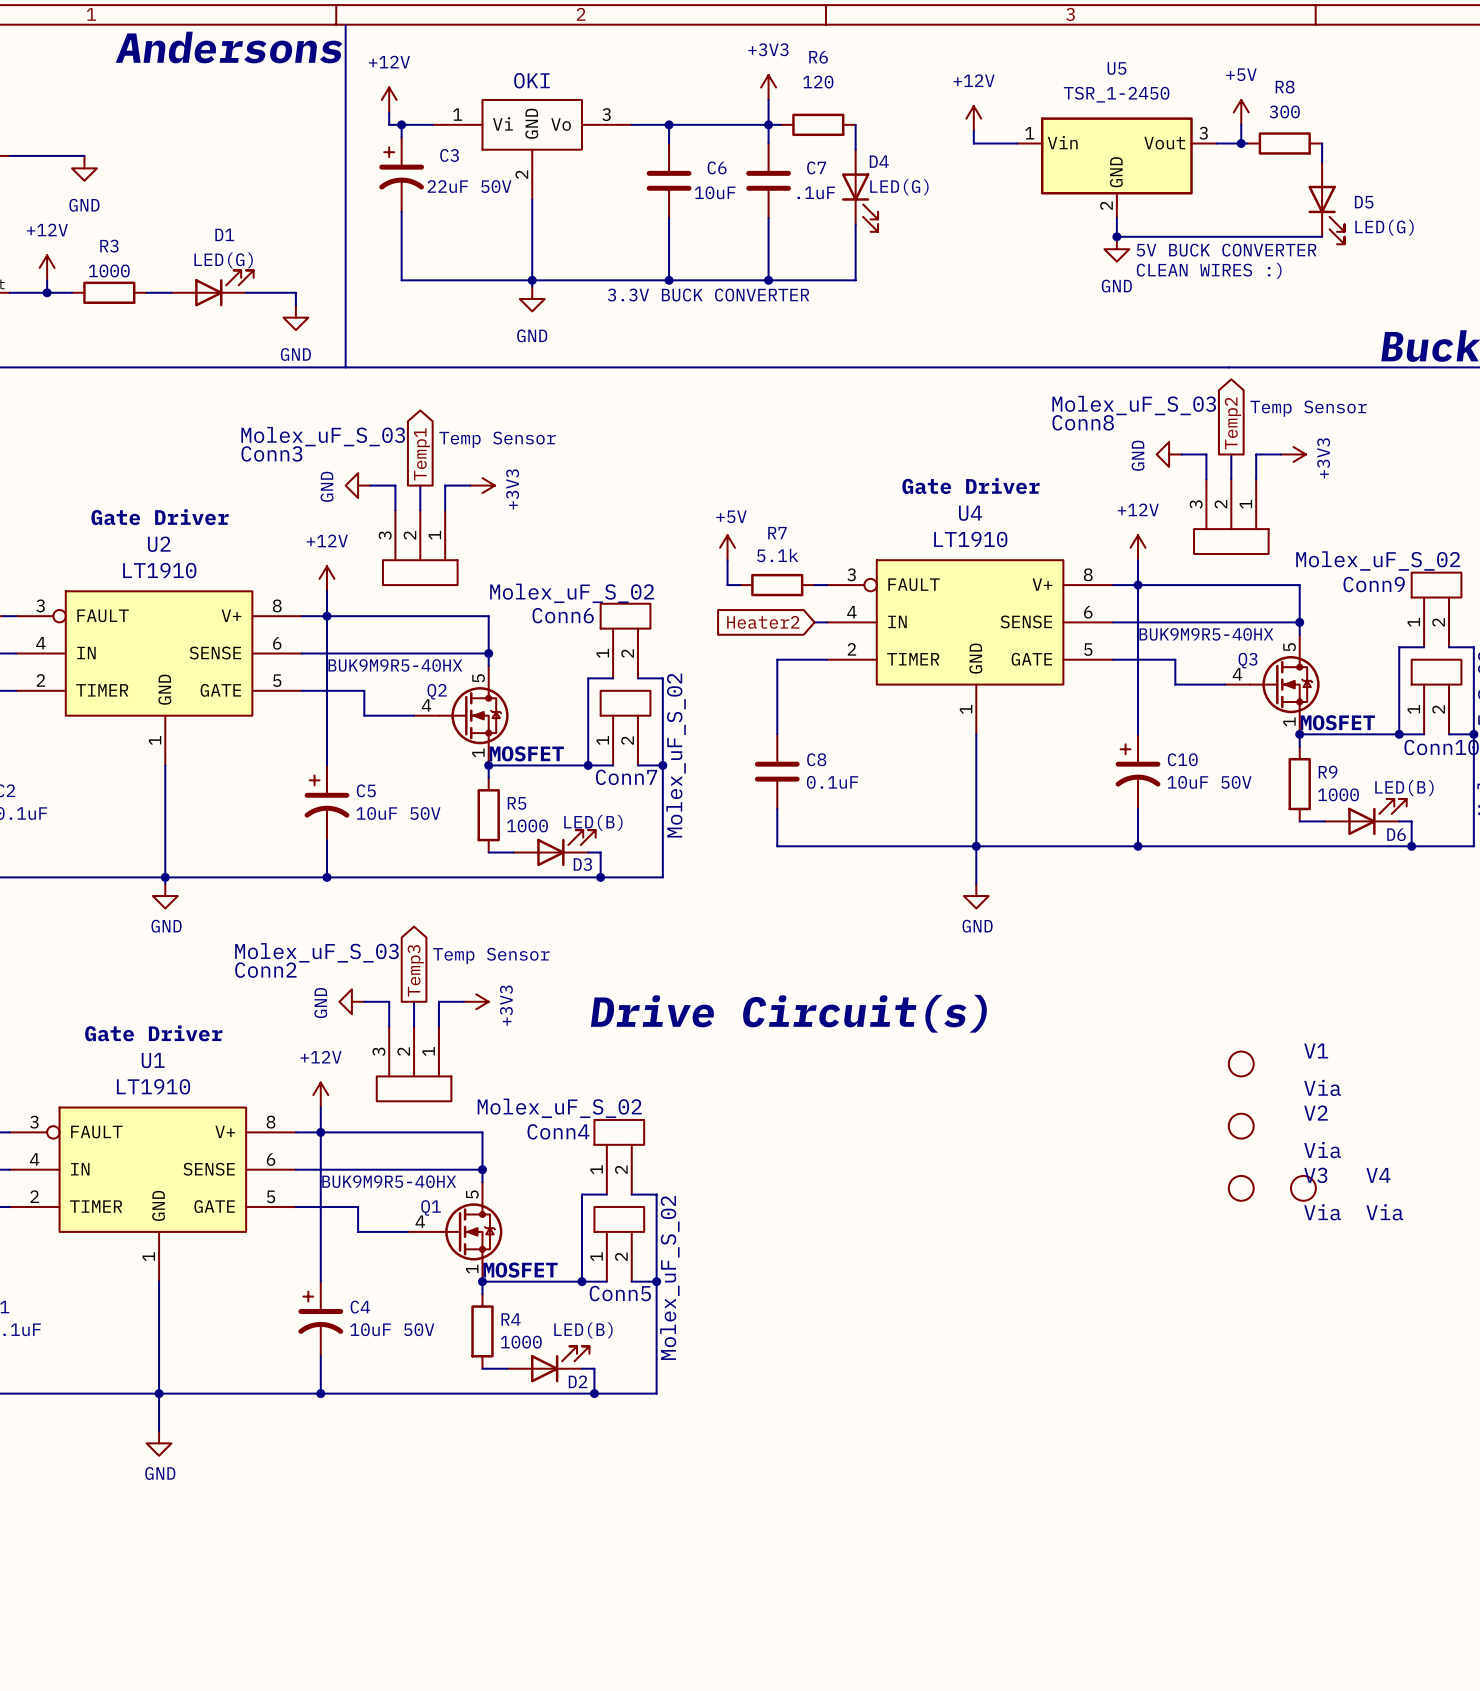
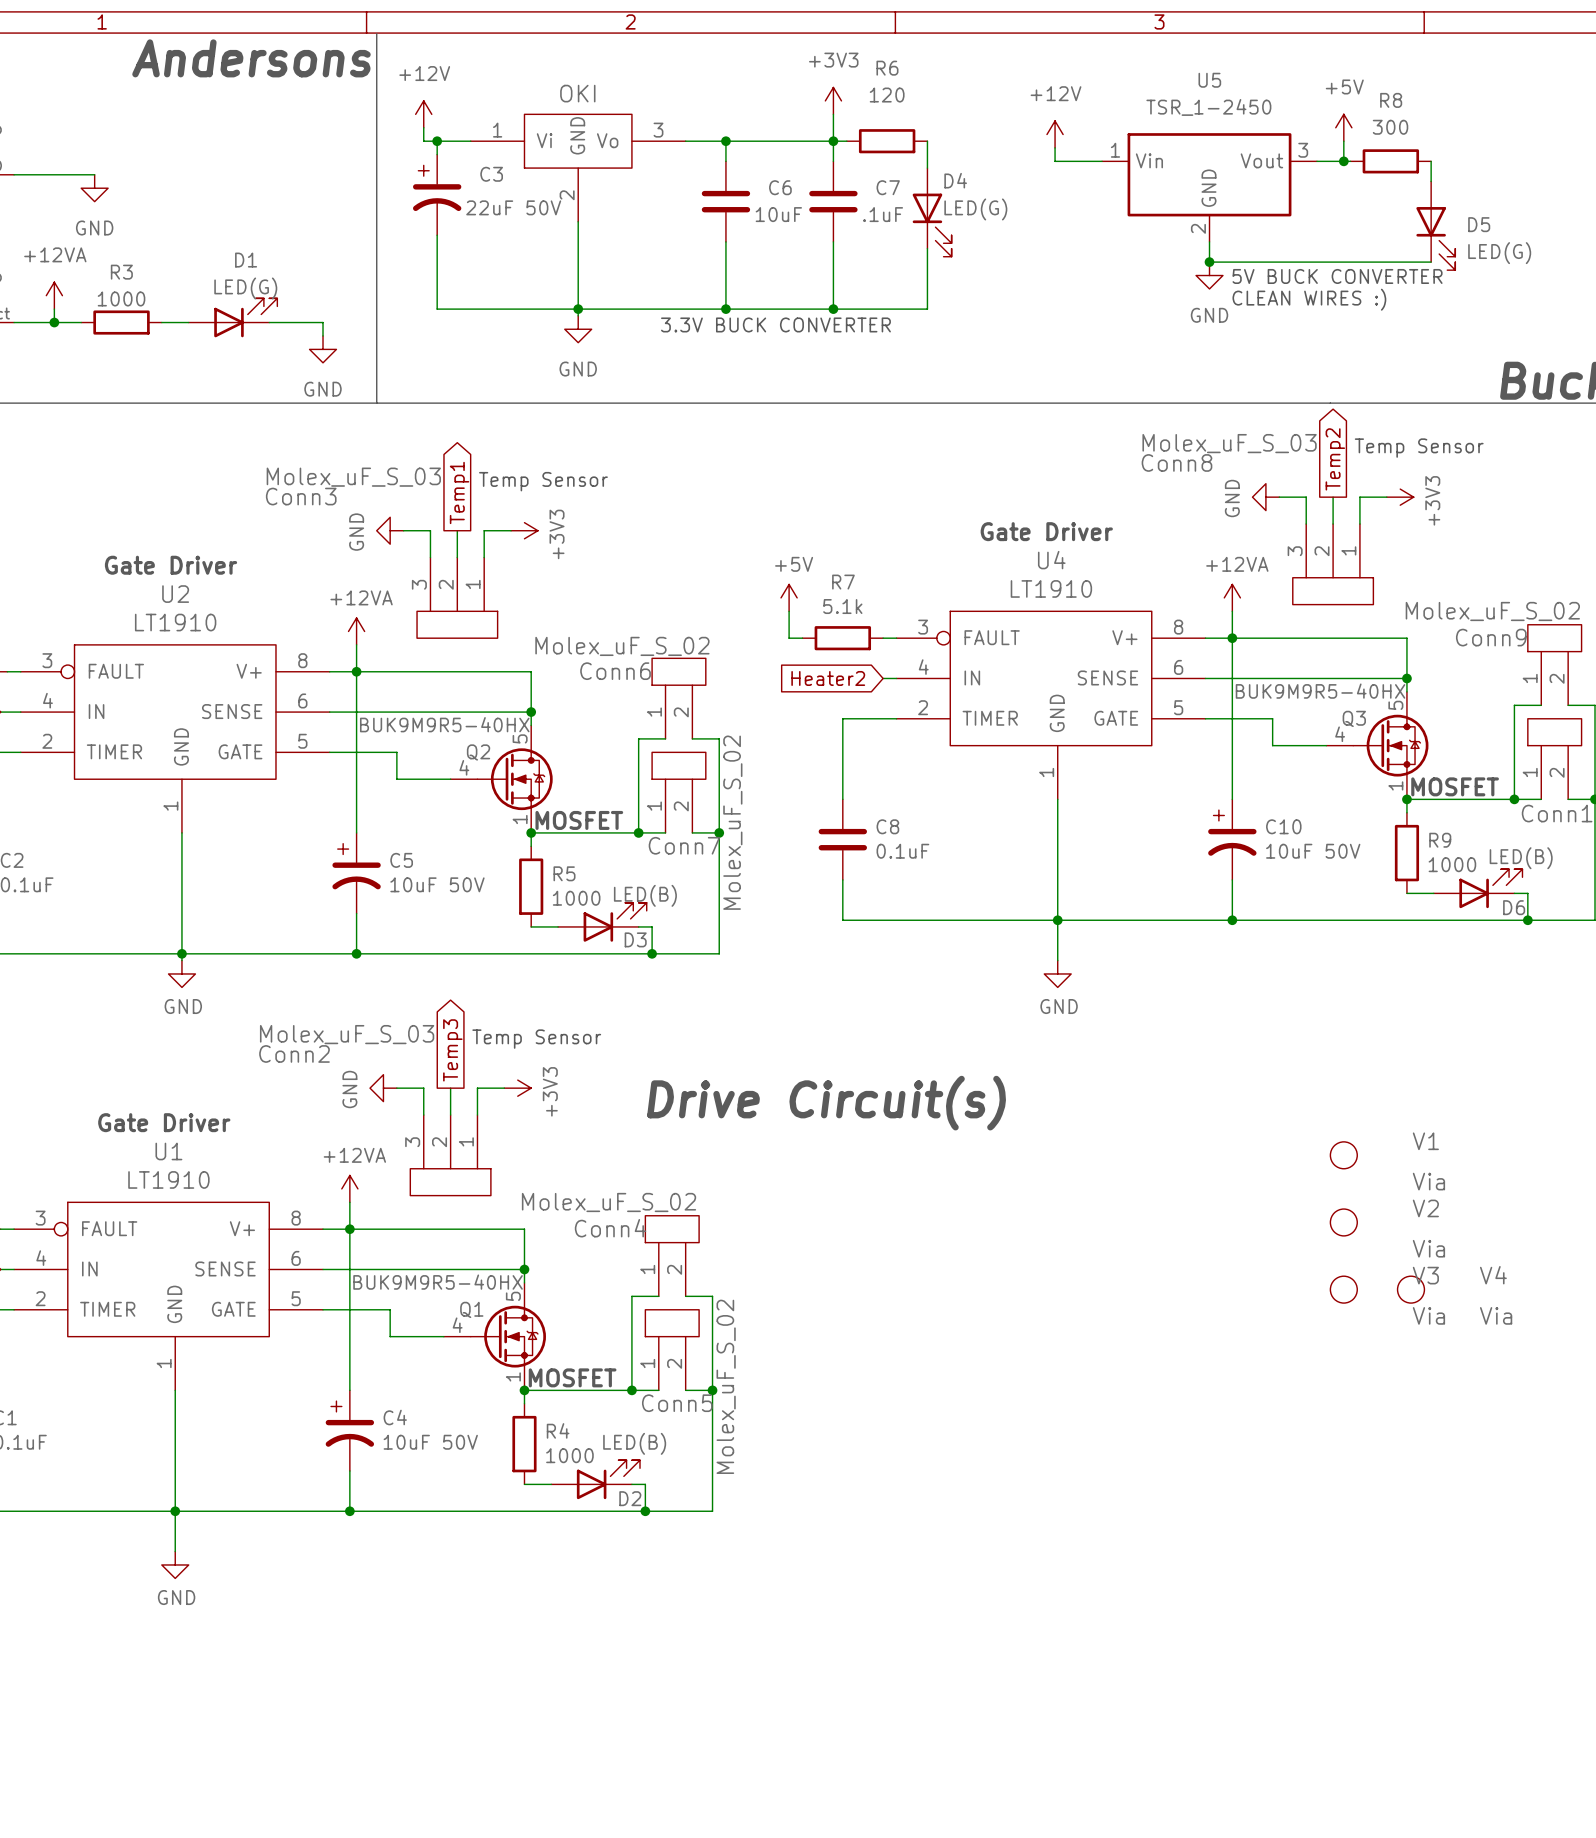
power symbol: +12V (47, 267) -> +12VA (54, 295)
power symbol: +12V (1138, 547) -> +12VA (1232, 597)
power symbol: +12V (327, 578) -> +12VA (356, 631)
power symbol: +12V (320, 1095) -> +12VA (349, 1188)

